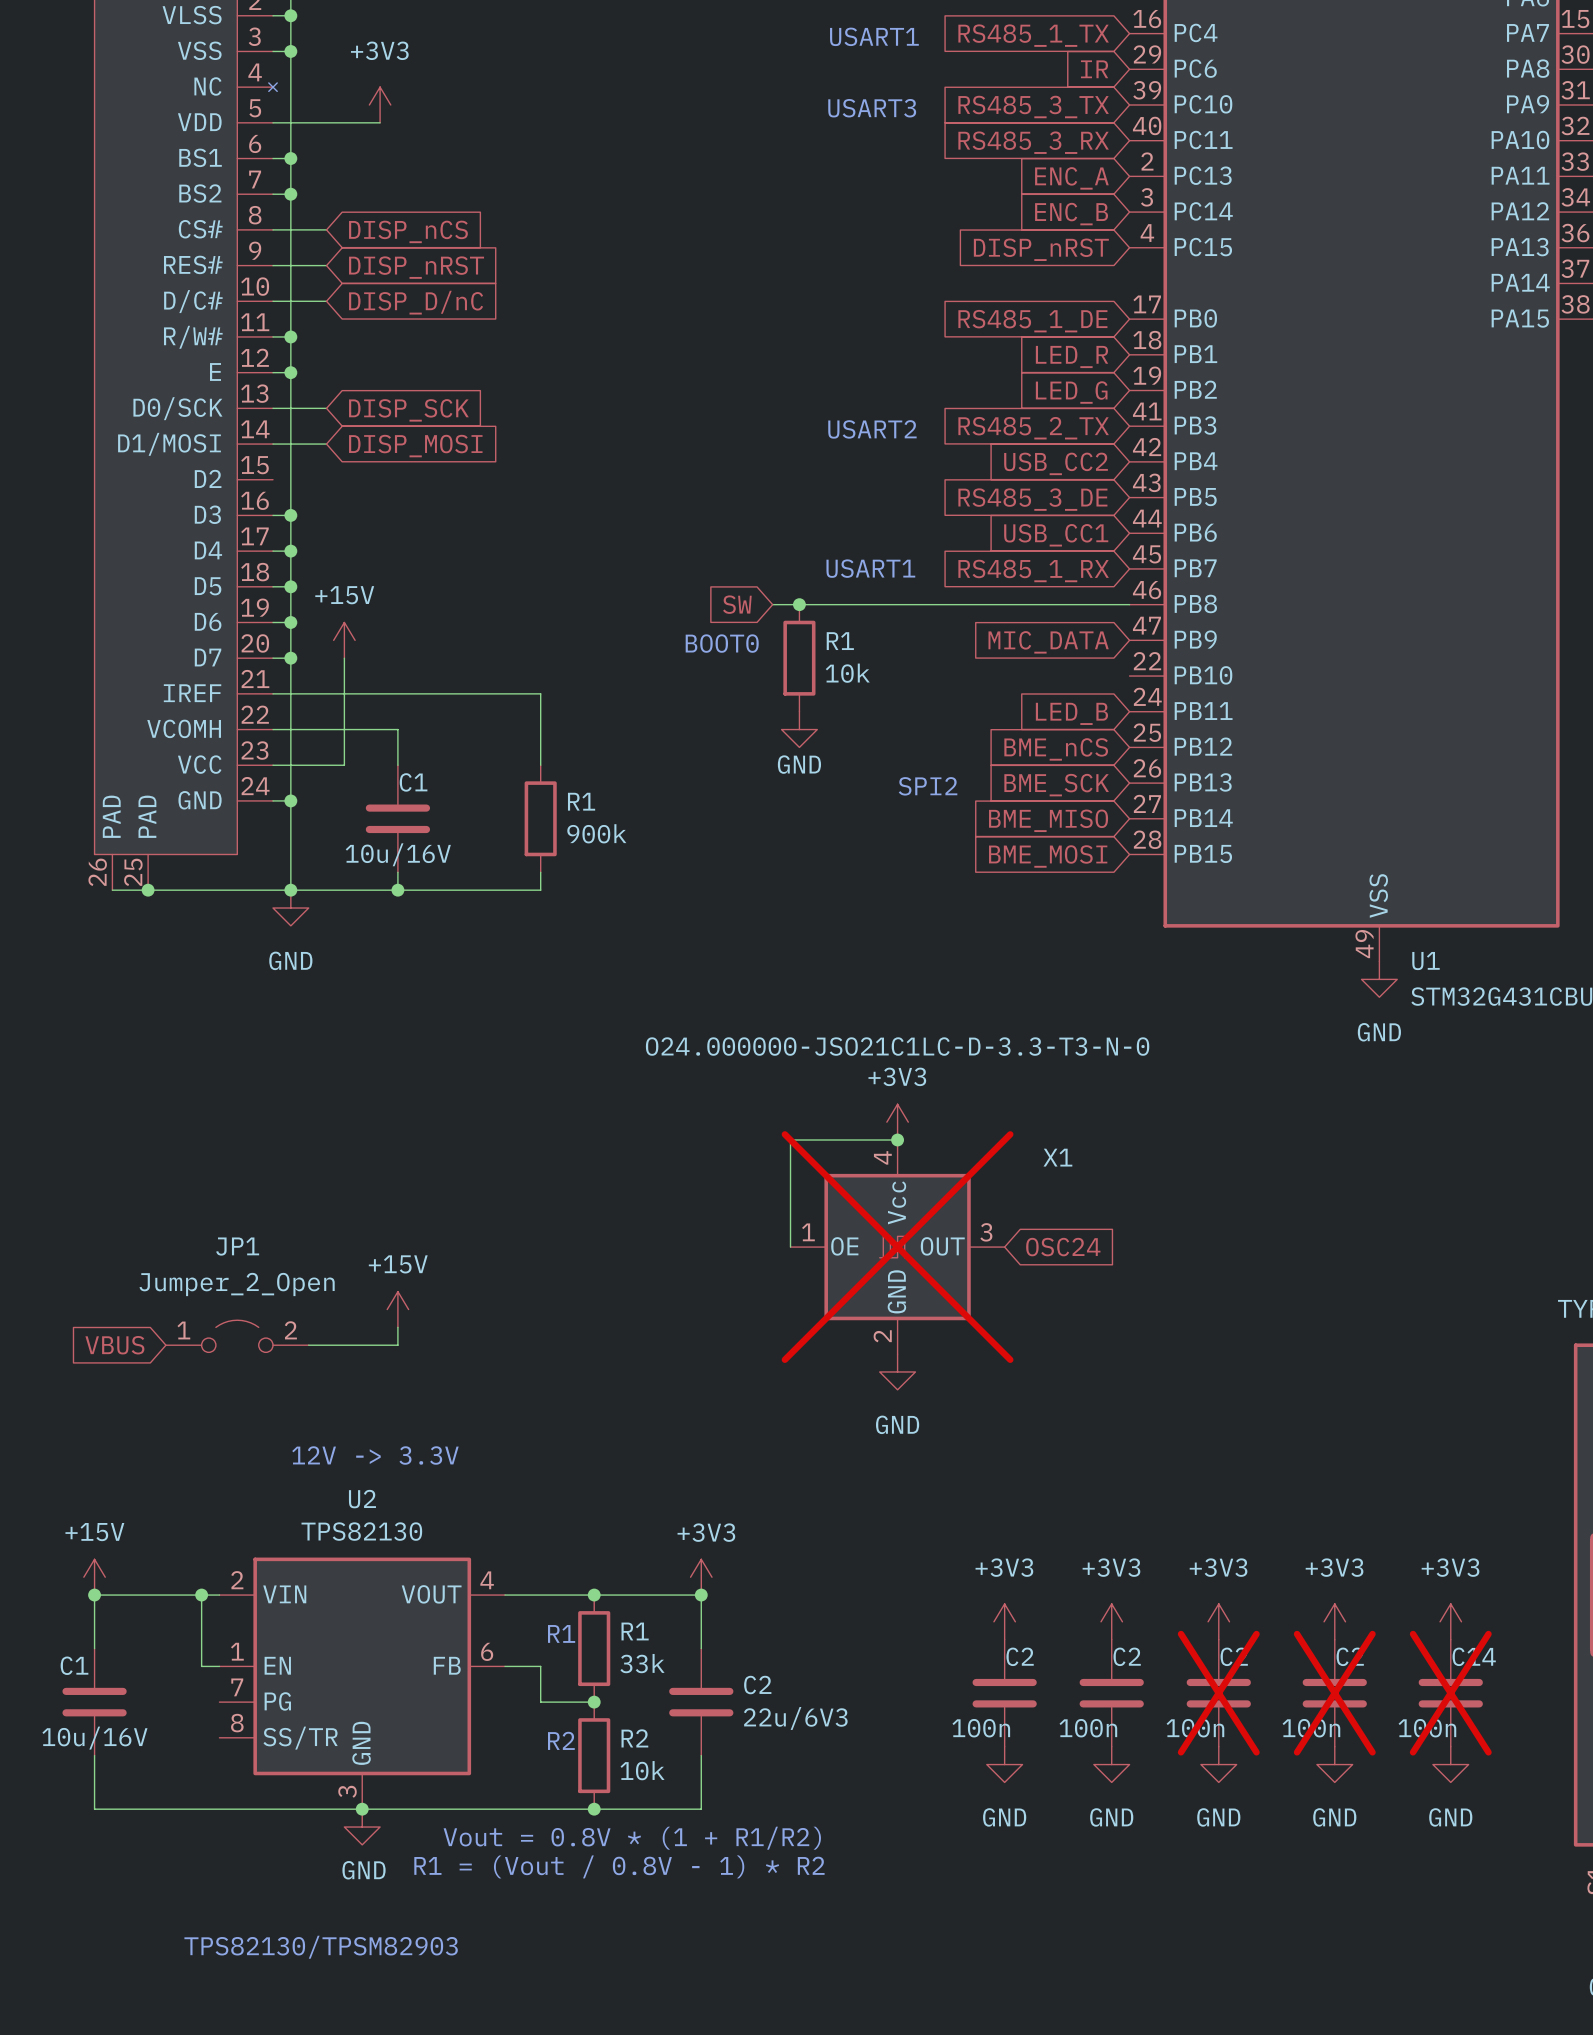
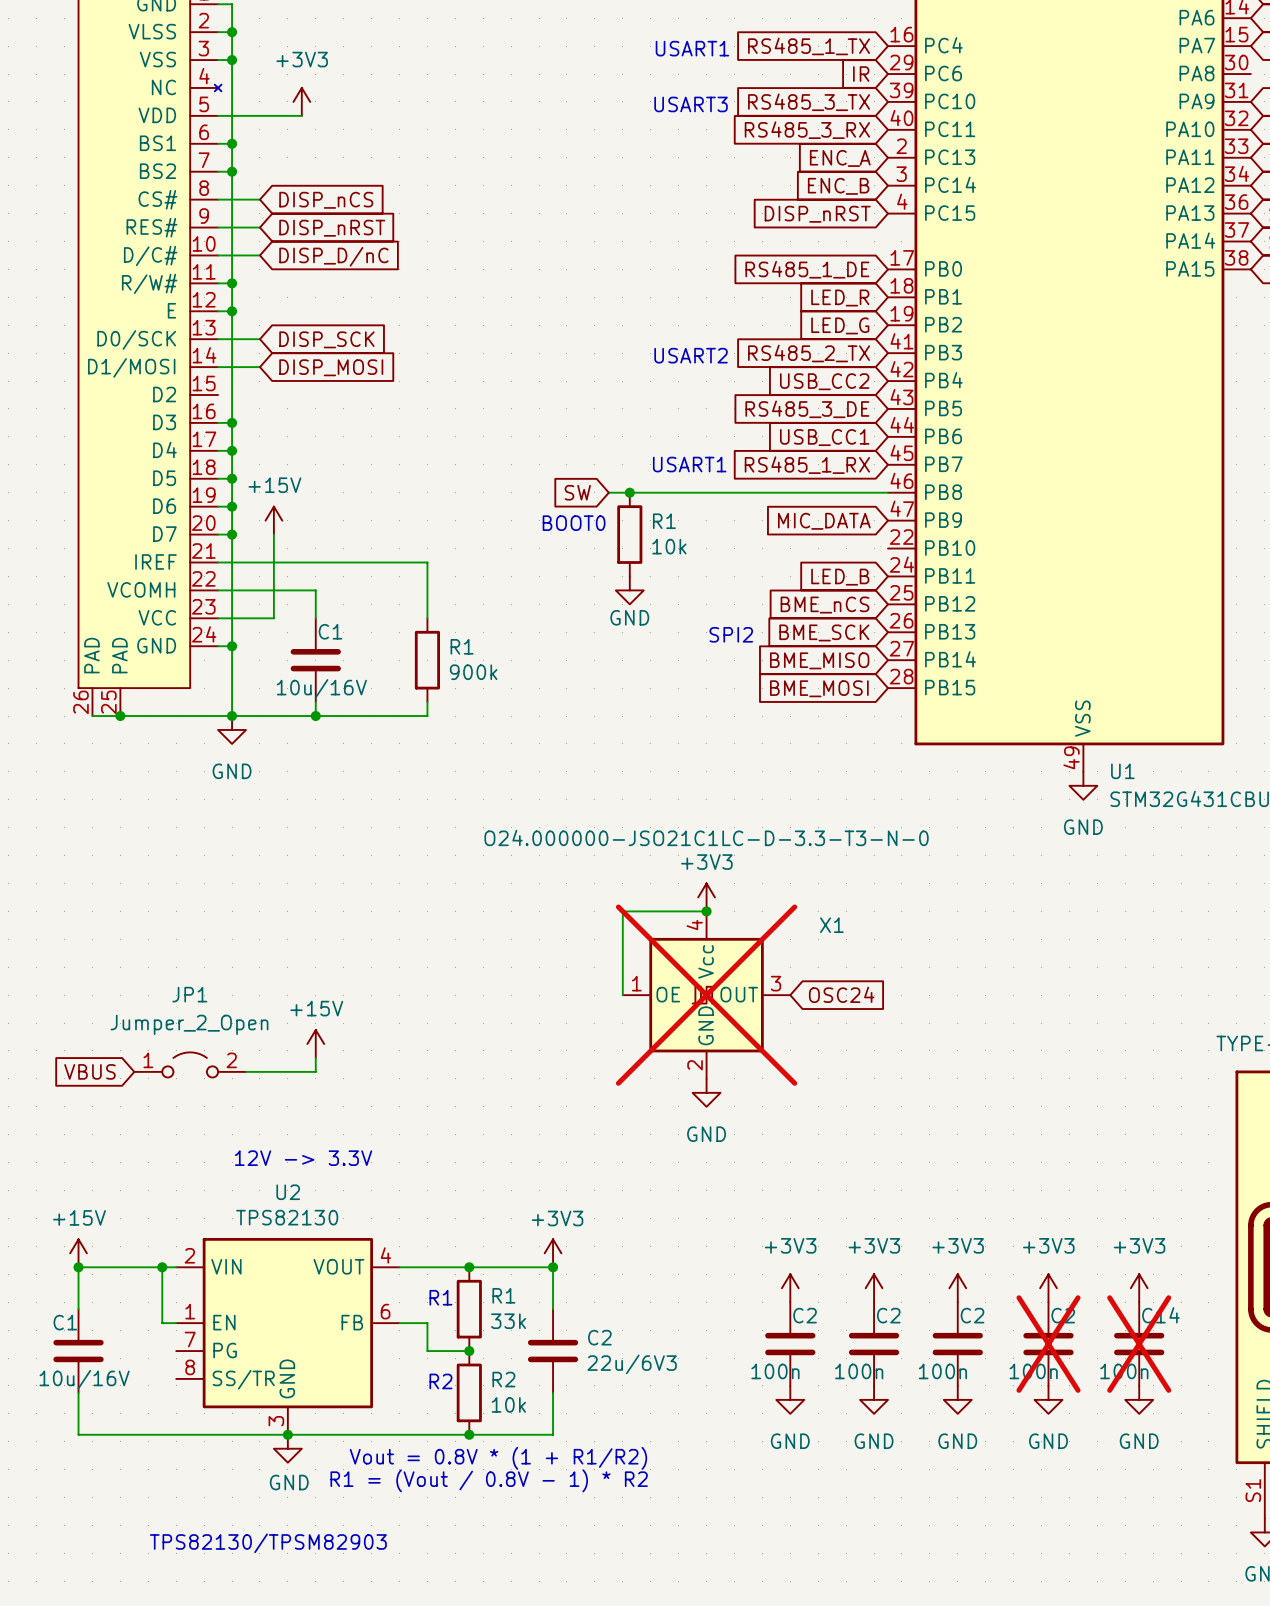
C2 do-not-place cross: (1218, 1693) -> none

